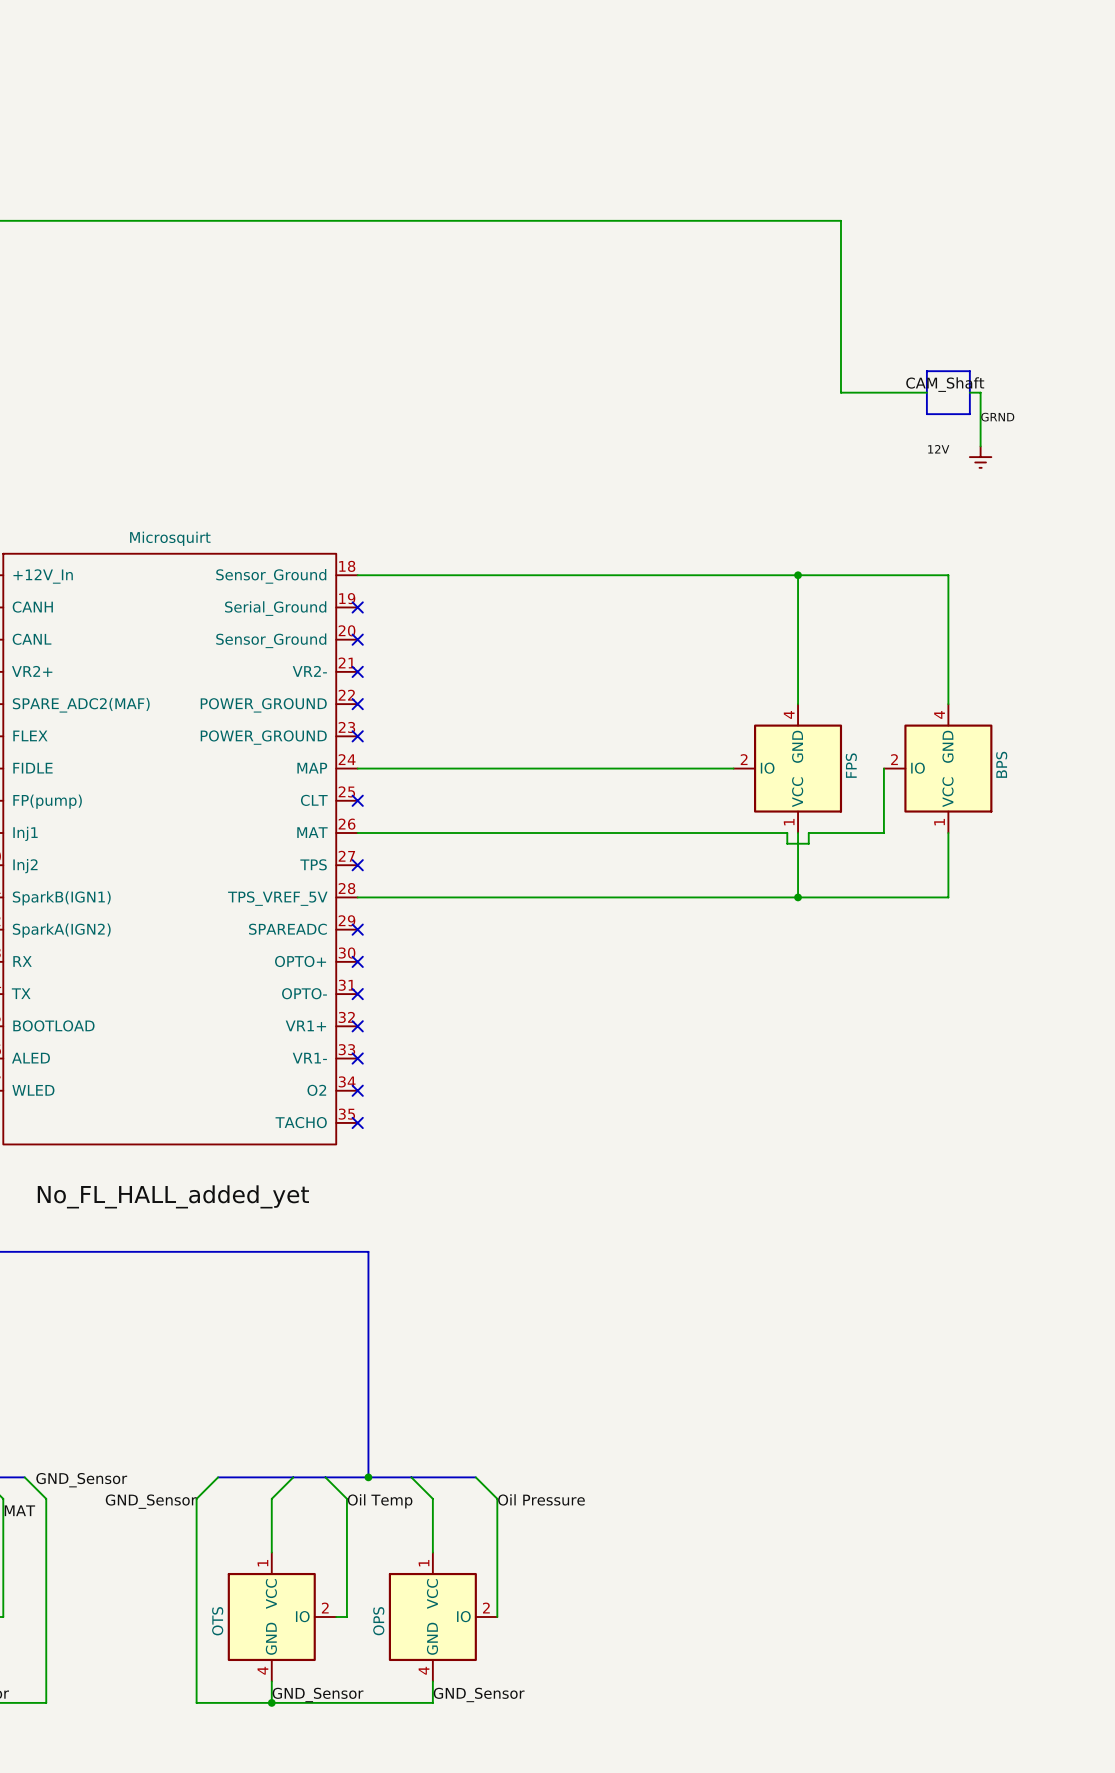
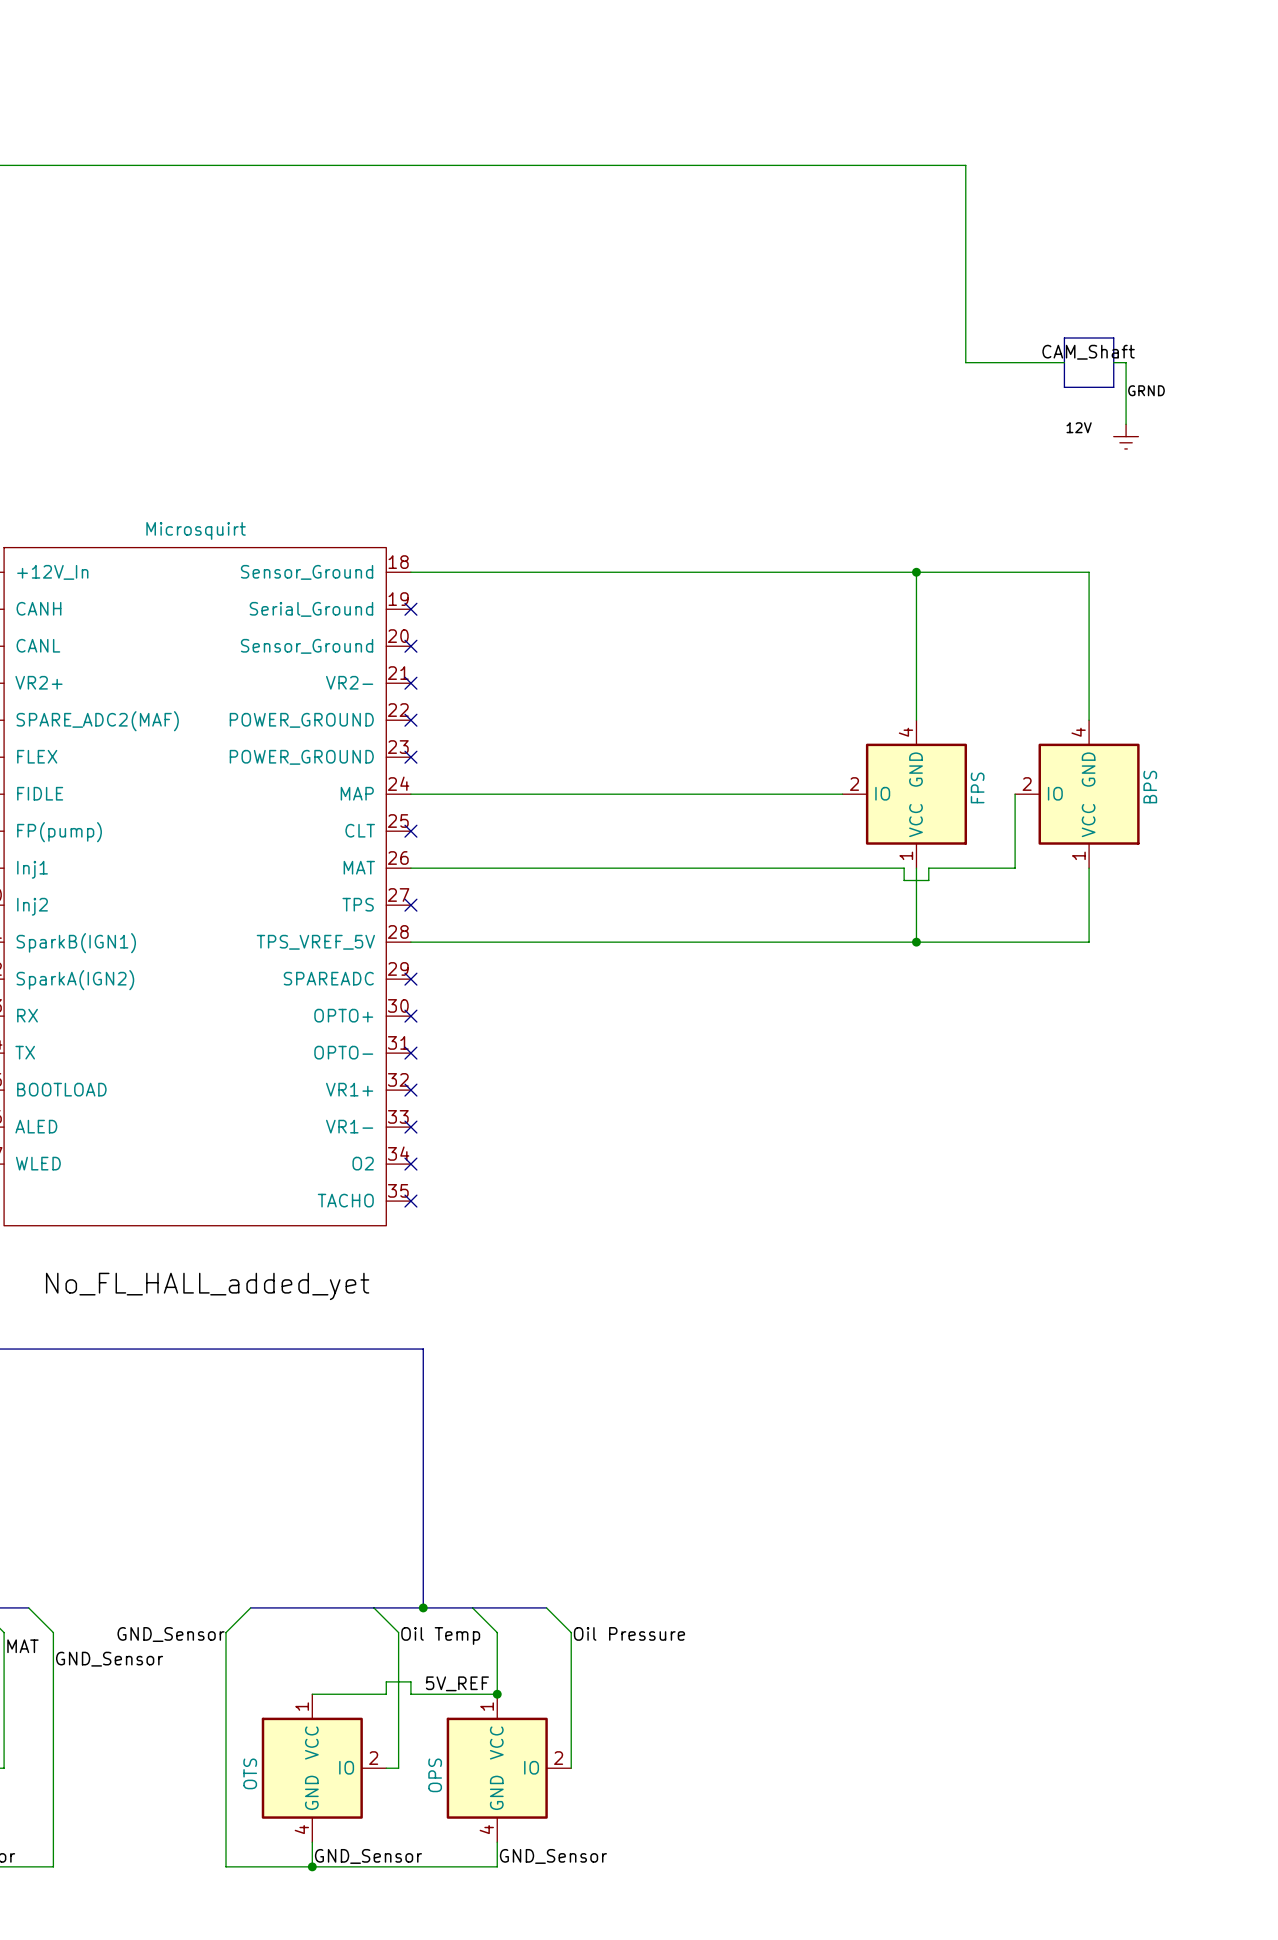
wire: (293, 1477) (271, 1498) (271, 1552) -> (497, 1694) (410, 1694) (410, 1681) (386, 1681) (386, 1694) (312, 1694)
label position: GND_Sensor (81, 1480) -> GND_Sensor (109, 1659)
label: none -> 5V_REF (457, 1683)
junction: none -> (497, 1694)

